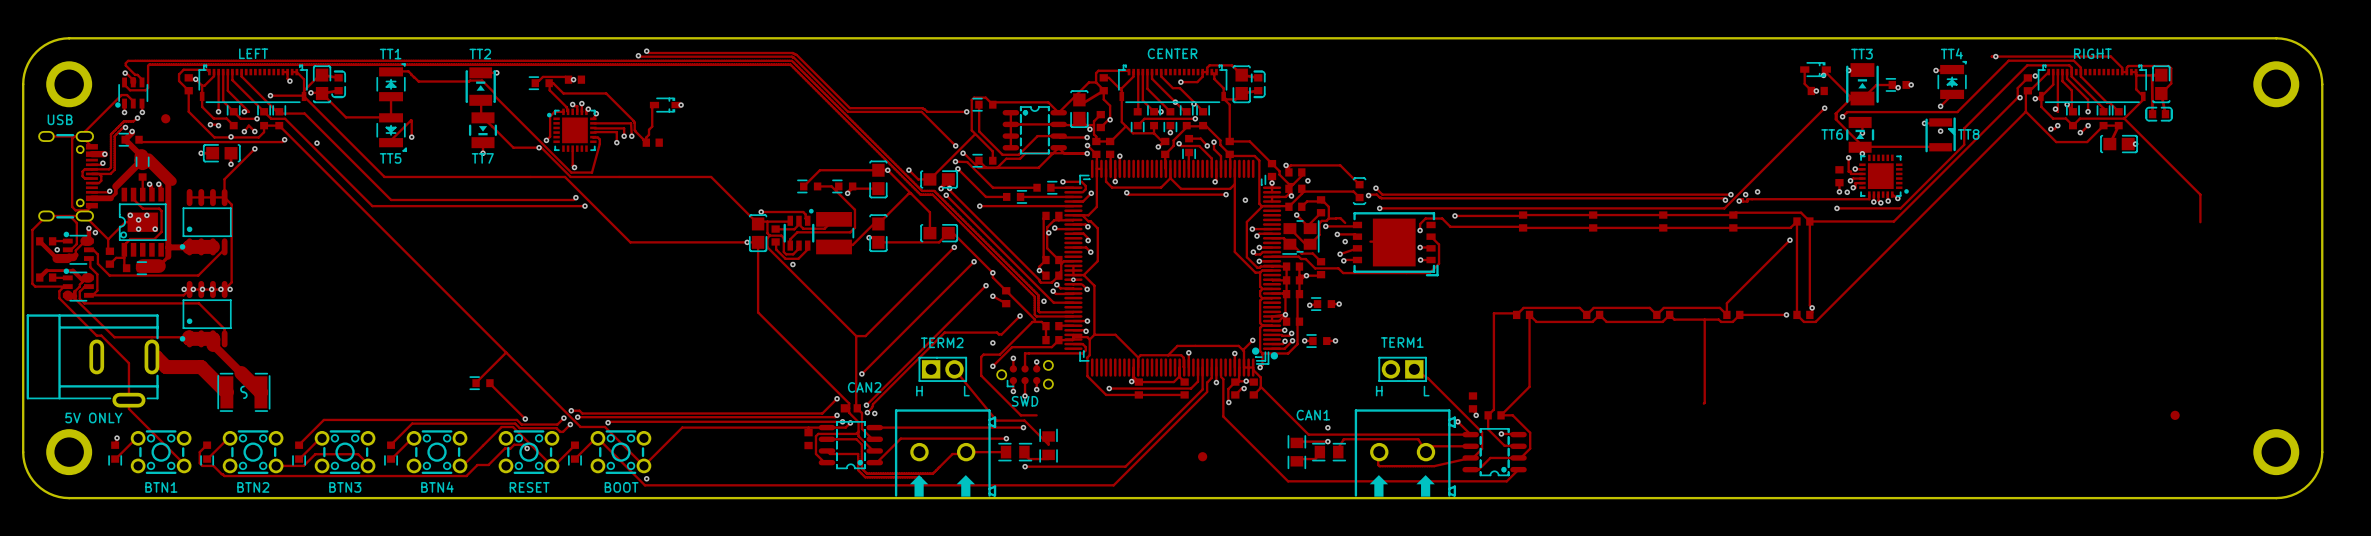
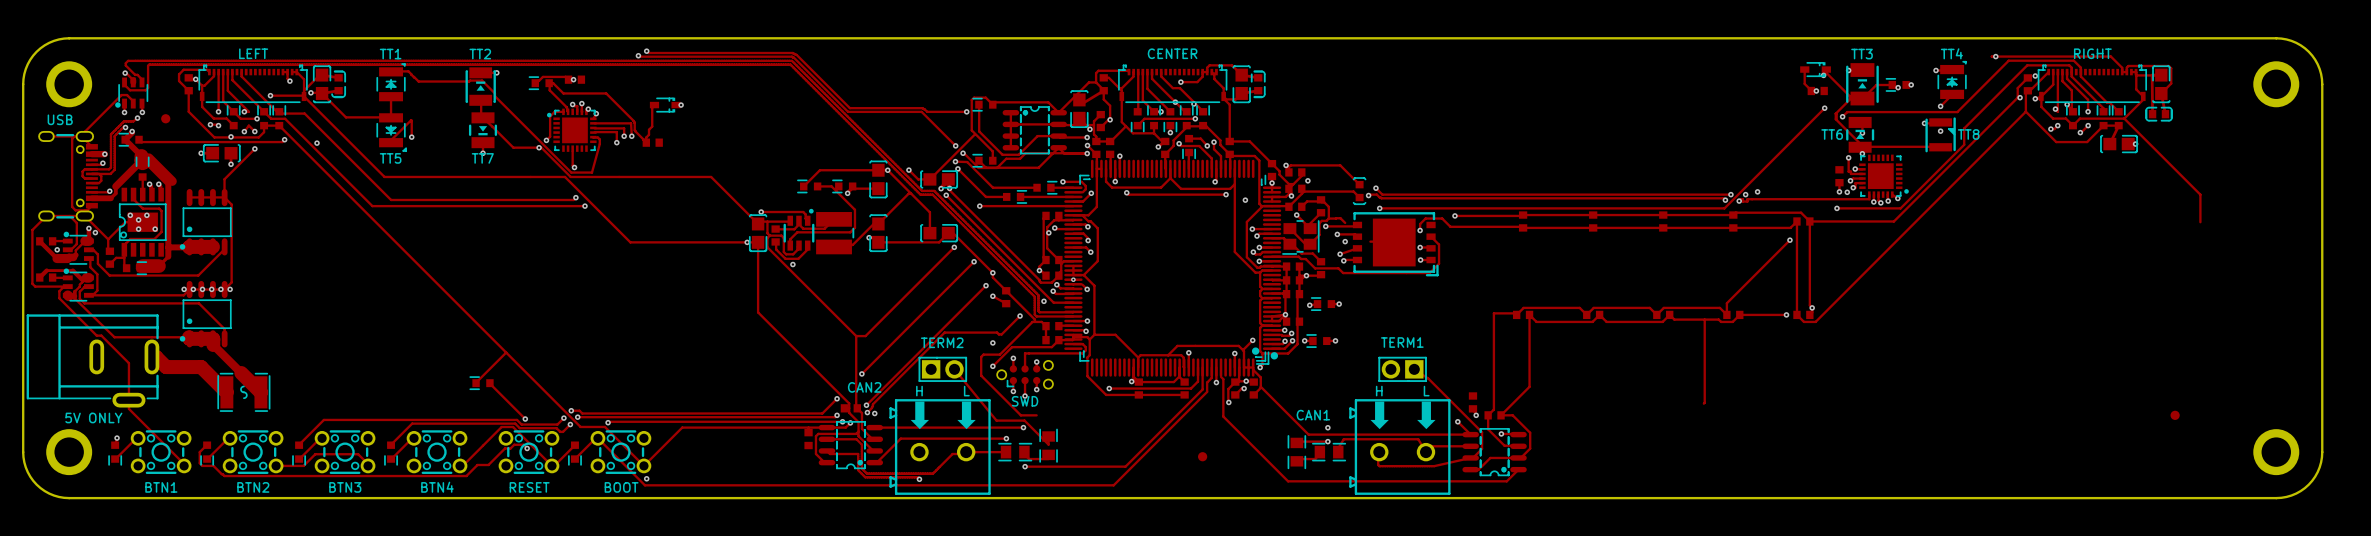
part footprint: [894, 409, 997, 497] -> [889, 399, 991, 495]
part footprint: [1354, 409, 1457, 497] -> [1349, 399, 1451, 495]

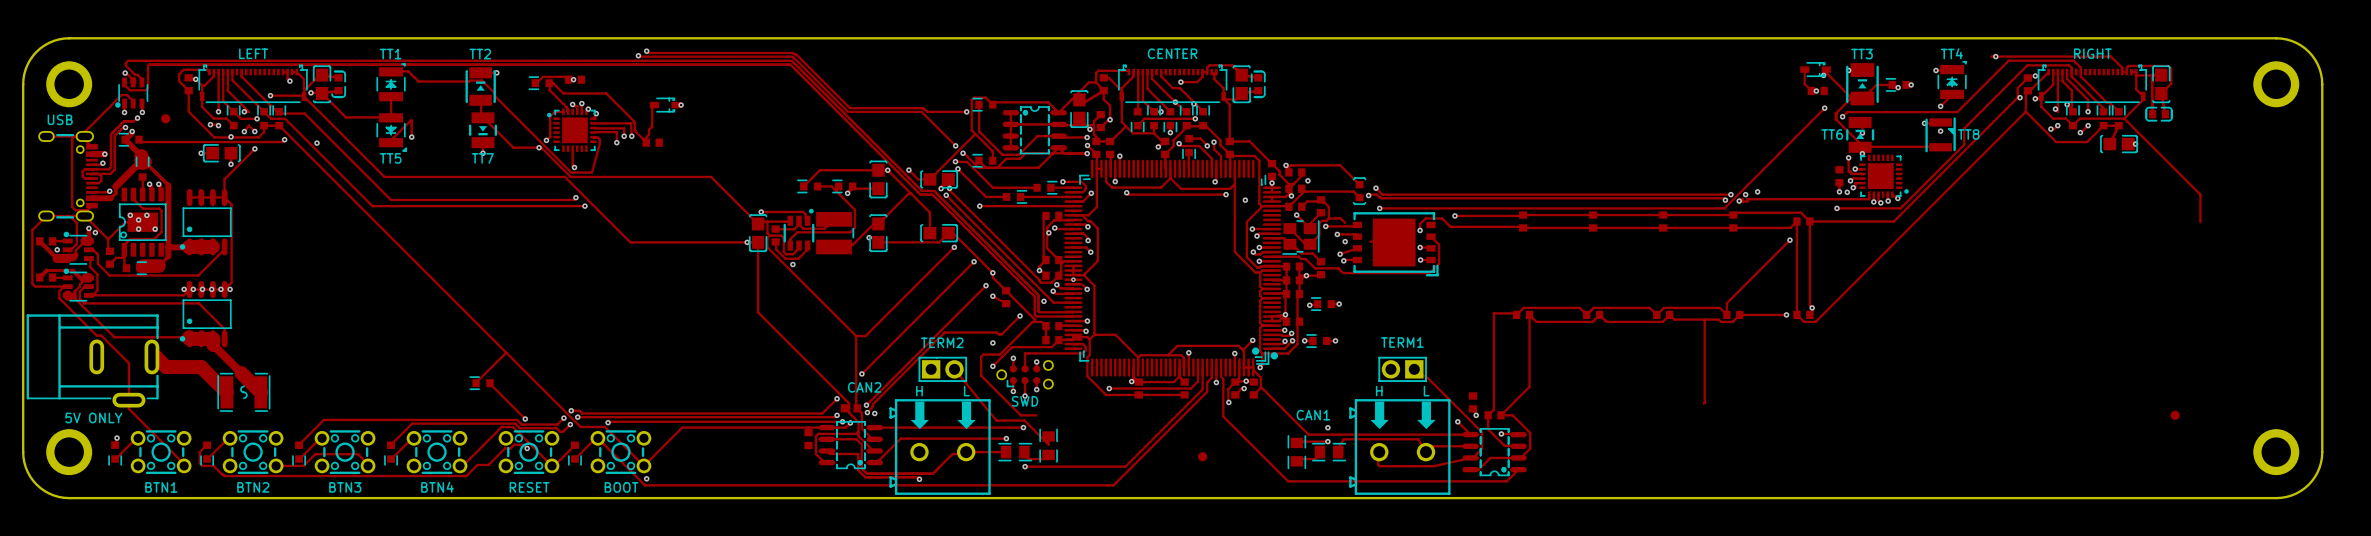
track: (148, 157) (172, 181) -> none

